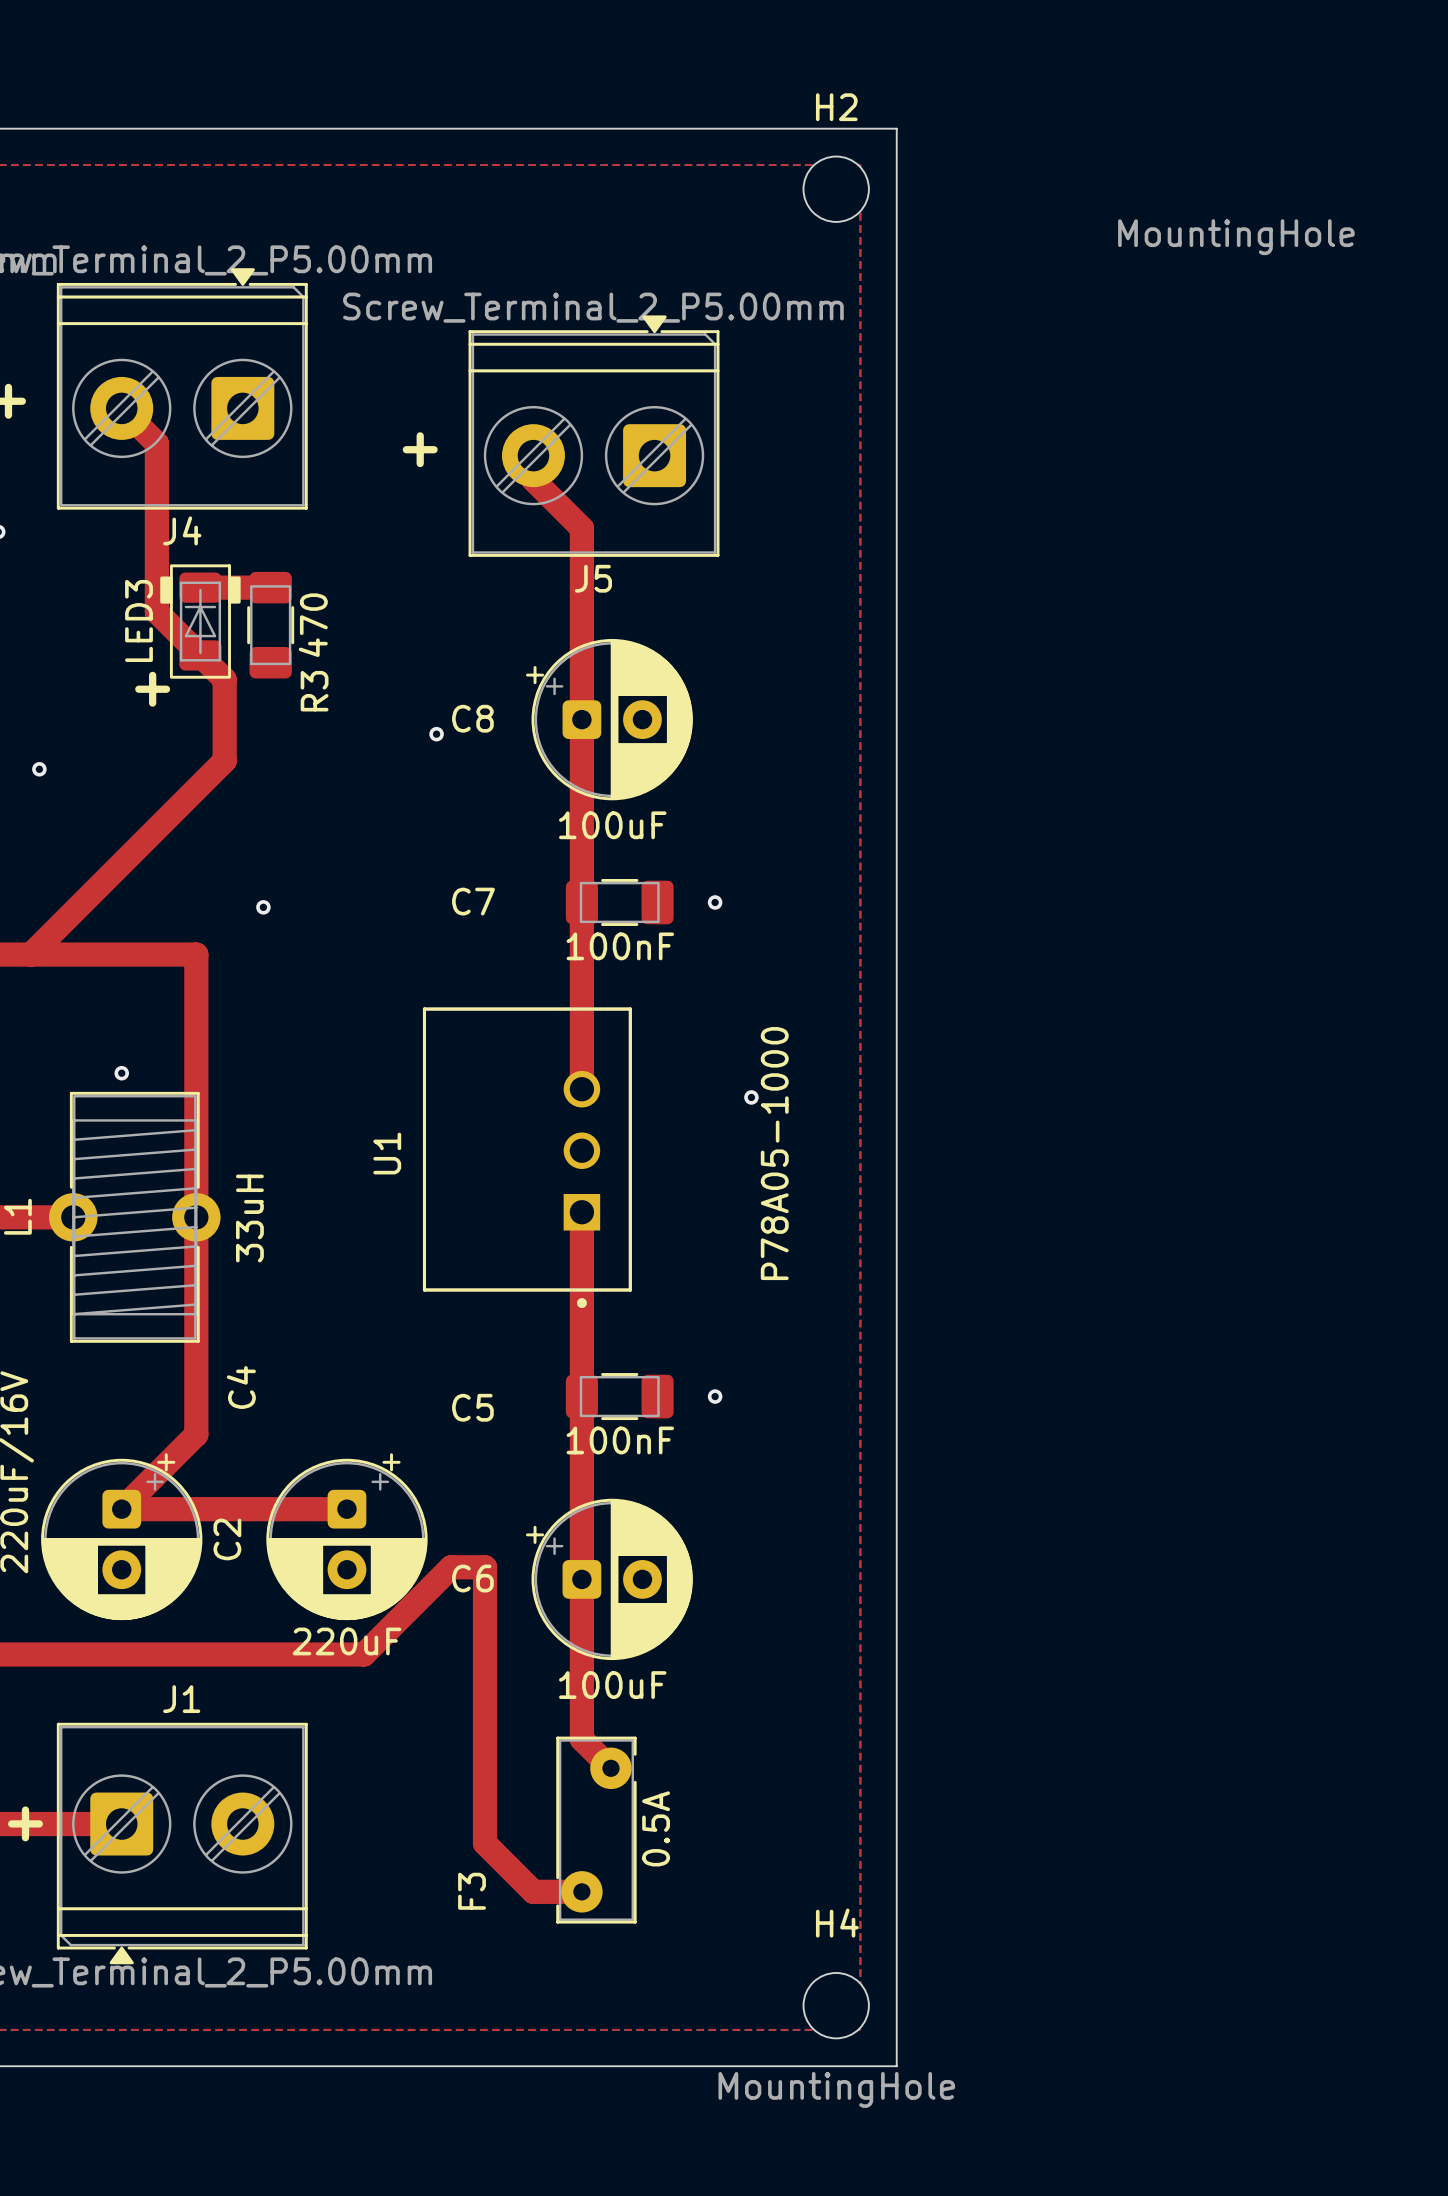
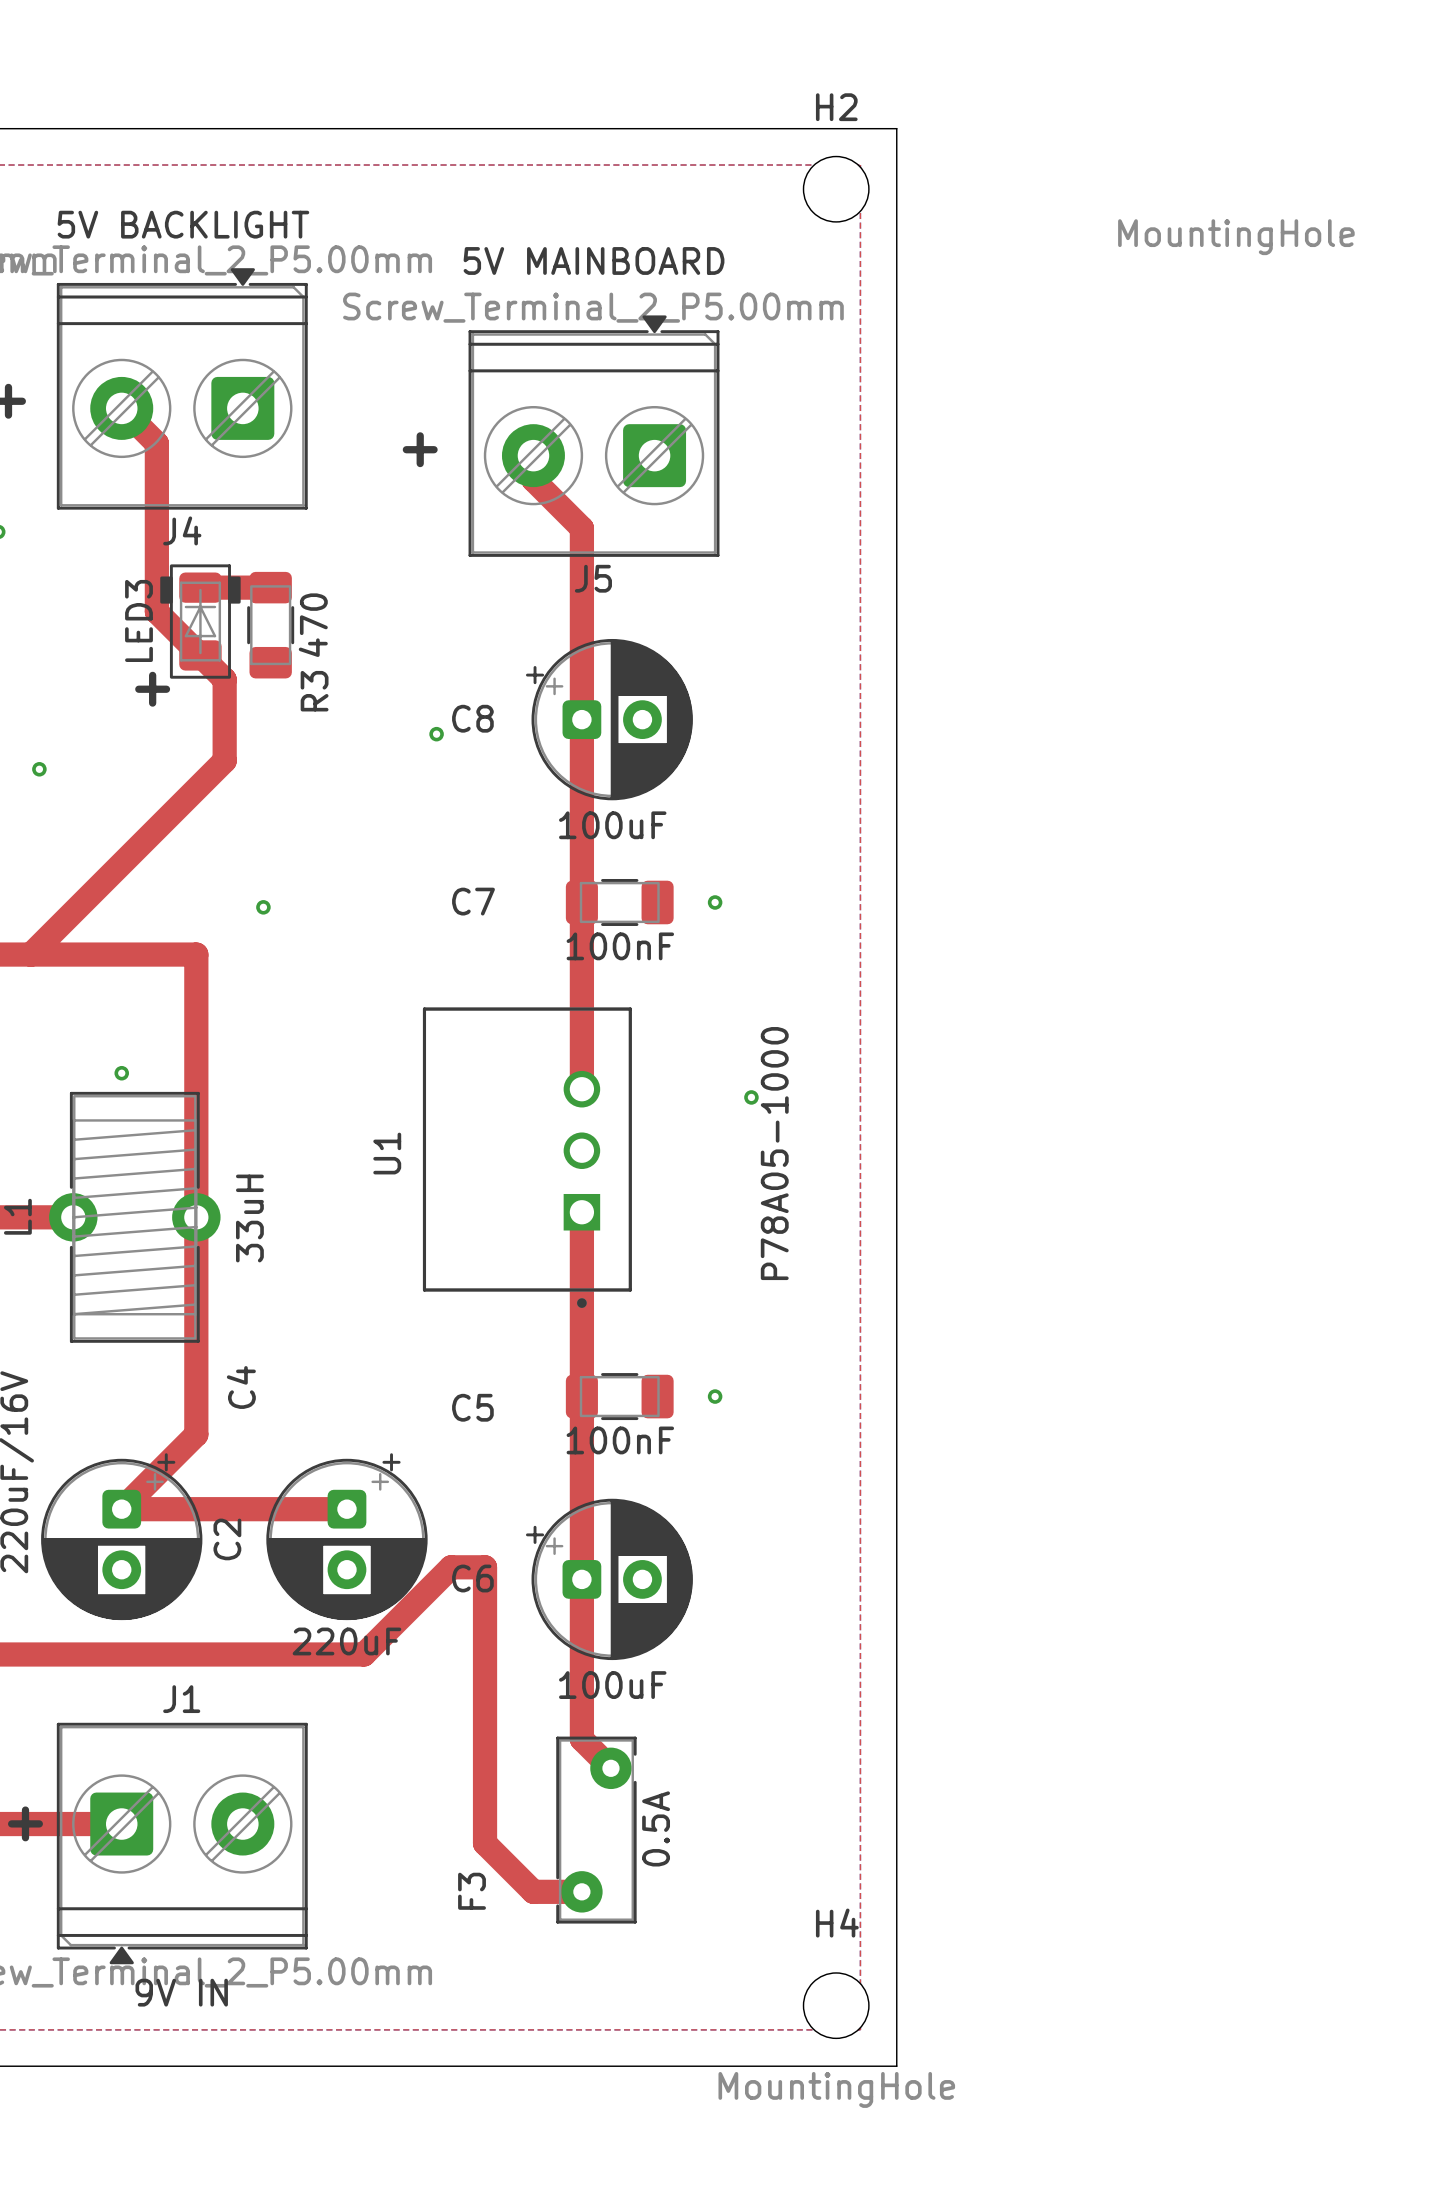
text: none -> 5V BACKLIGHT (183, 224)
text: none -> 5V MAINBOARD (594, 260)
text: none -> 9V IN (181, 1992)

